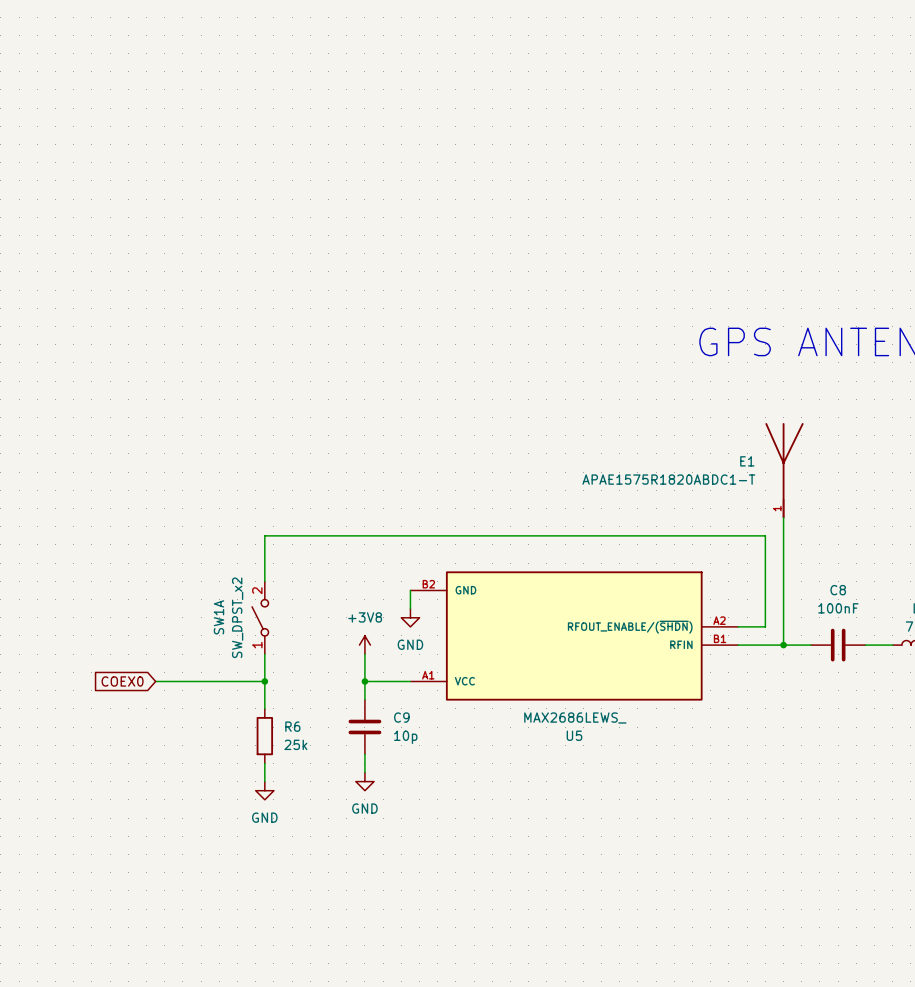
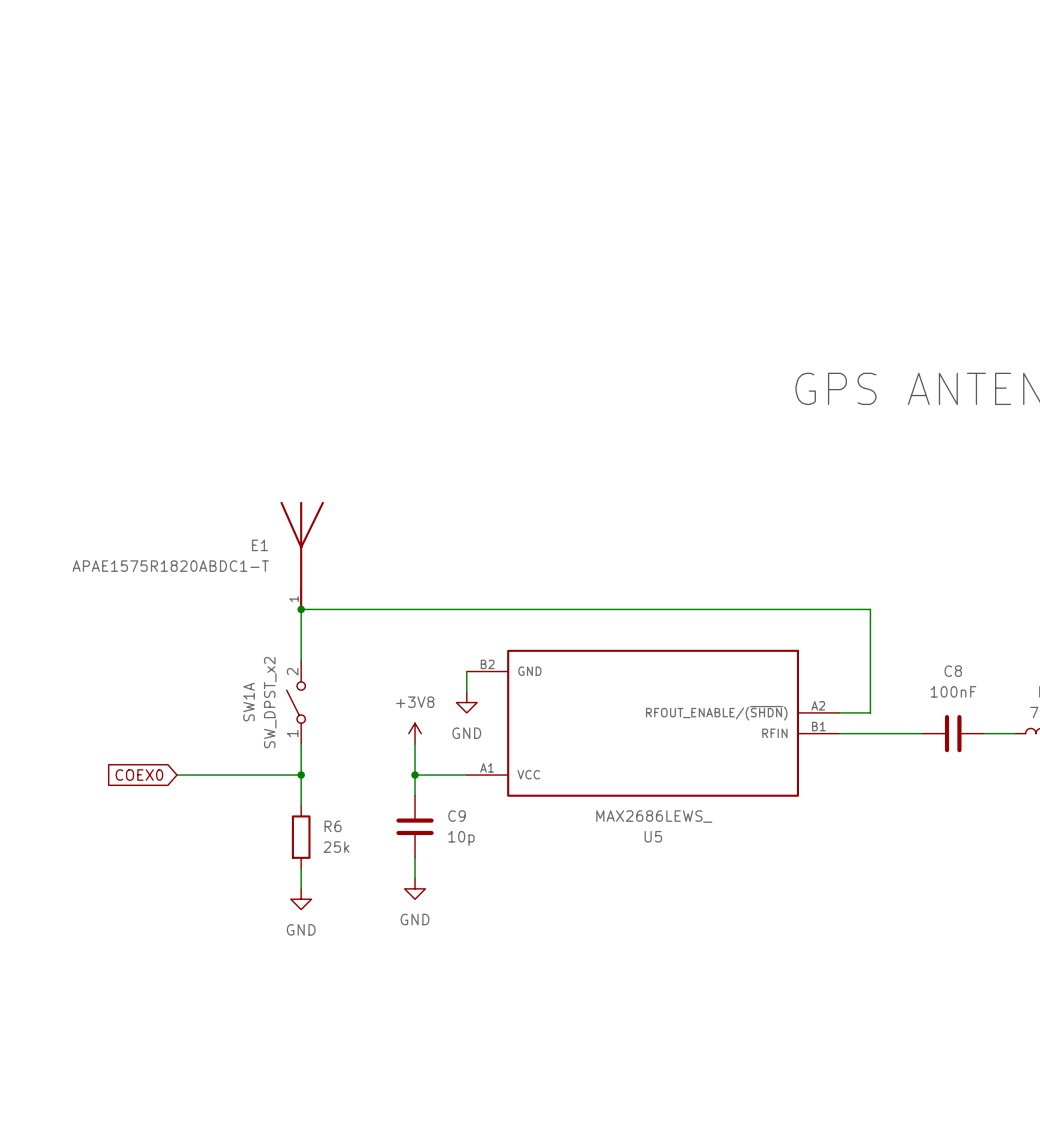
E1 position: (784, 470) -> (302, 556)
wire: (783, 517) (783, 645) -> none
junction: none -> (301, 609)
junction: (783, 645) -> none

